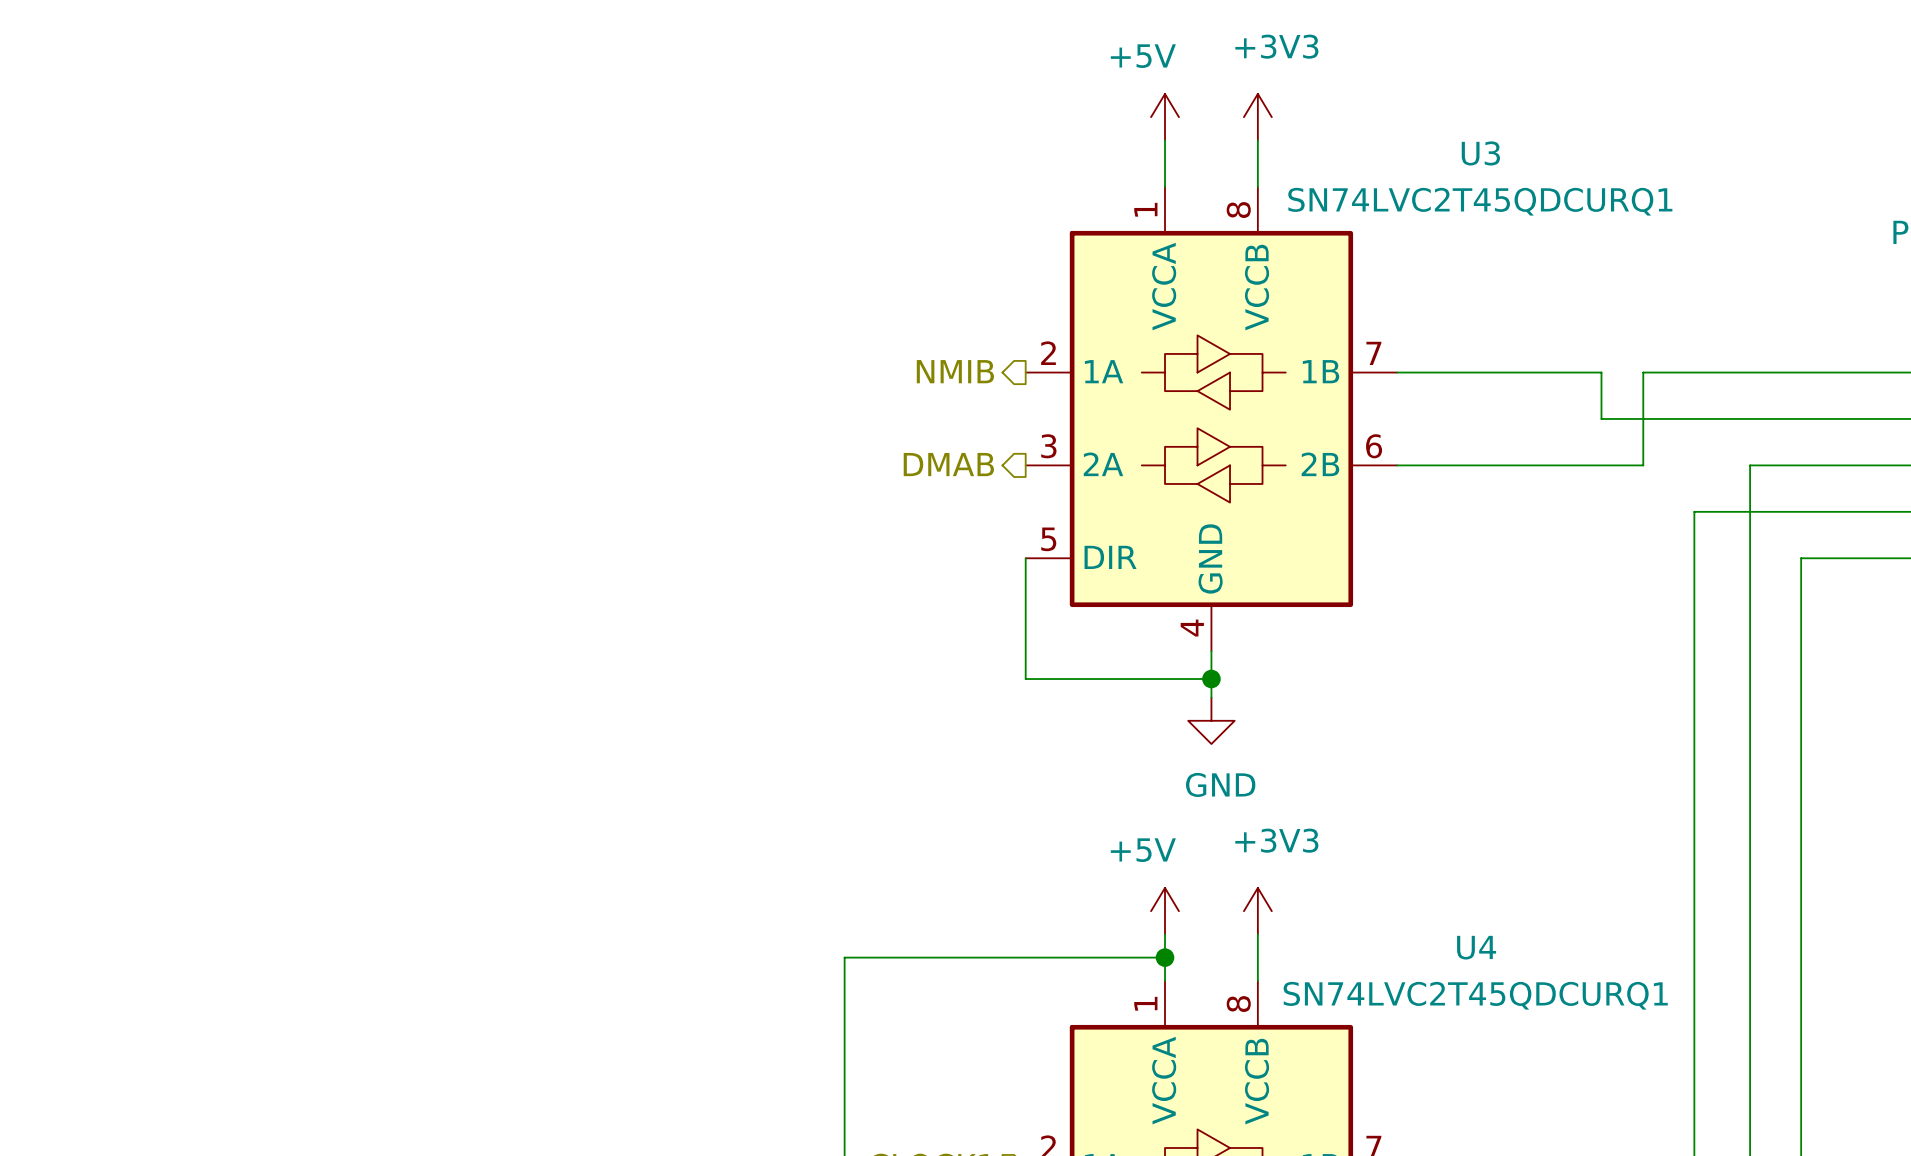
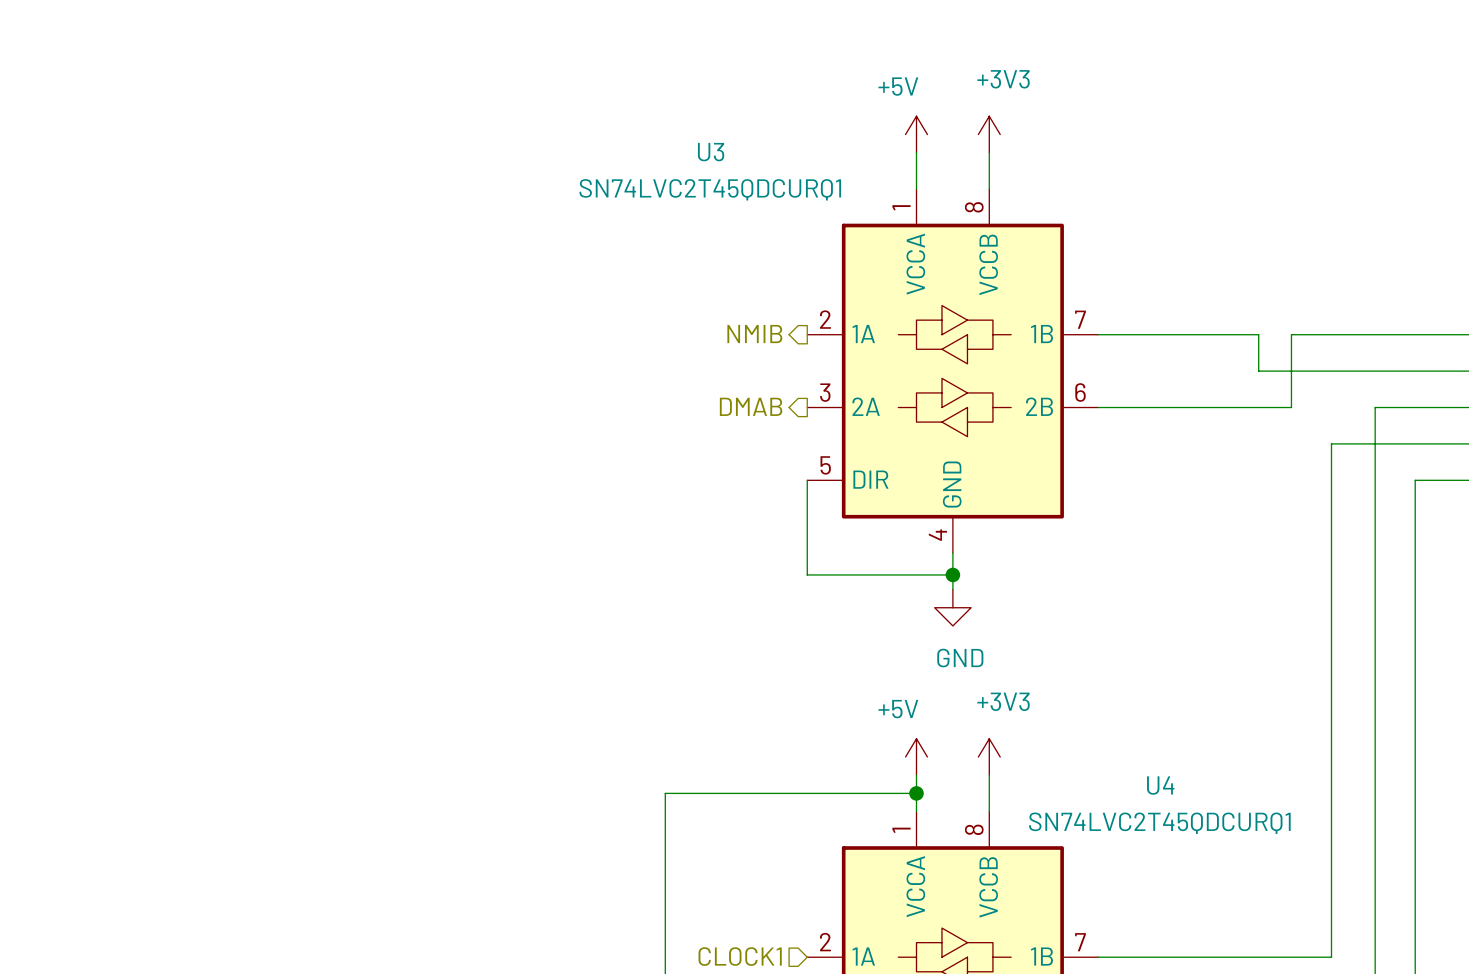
U3 name position: U3 (1480, 153) -> U3 (711, 152)
U3 value position: SN74LVC2T45QDCURQ1 (1480, 201) -> SN74LVC2T45QDCURQ1 (710, 189)

